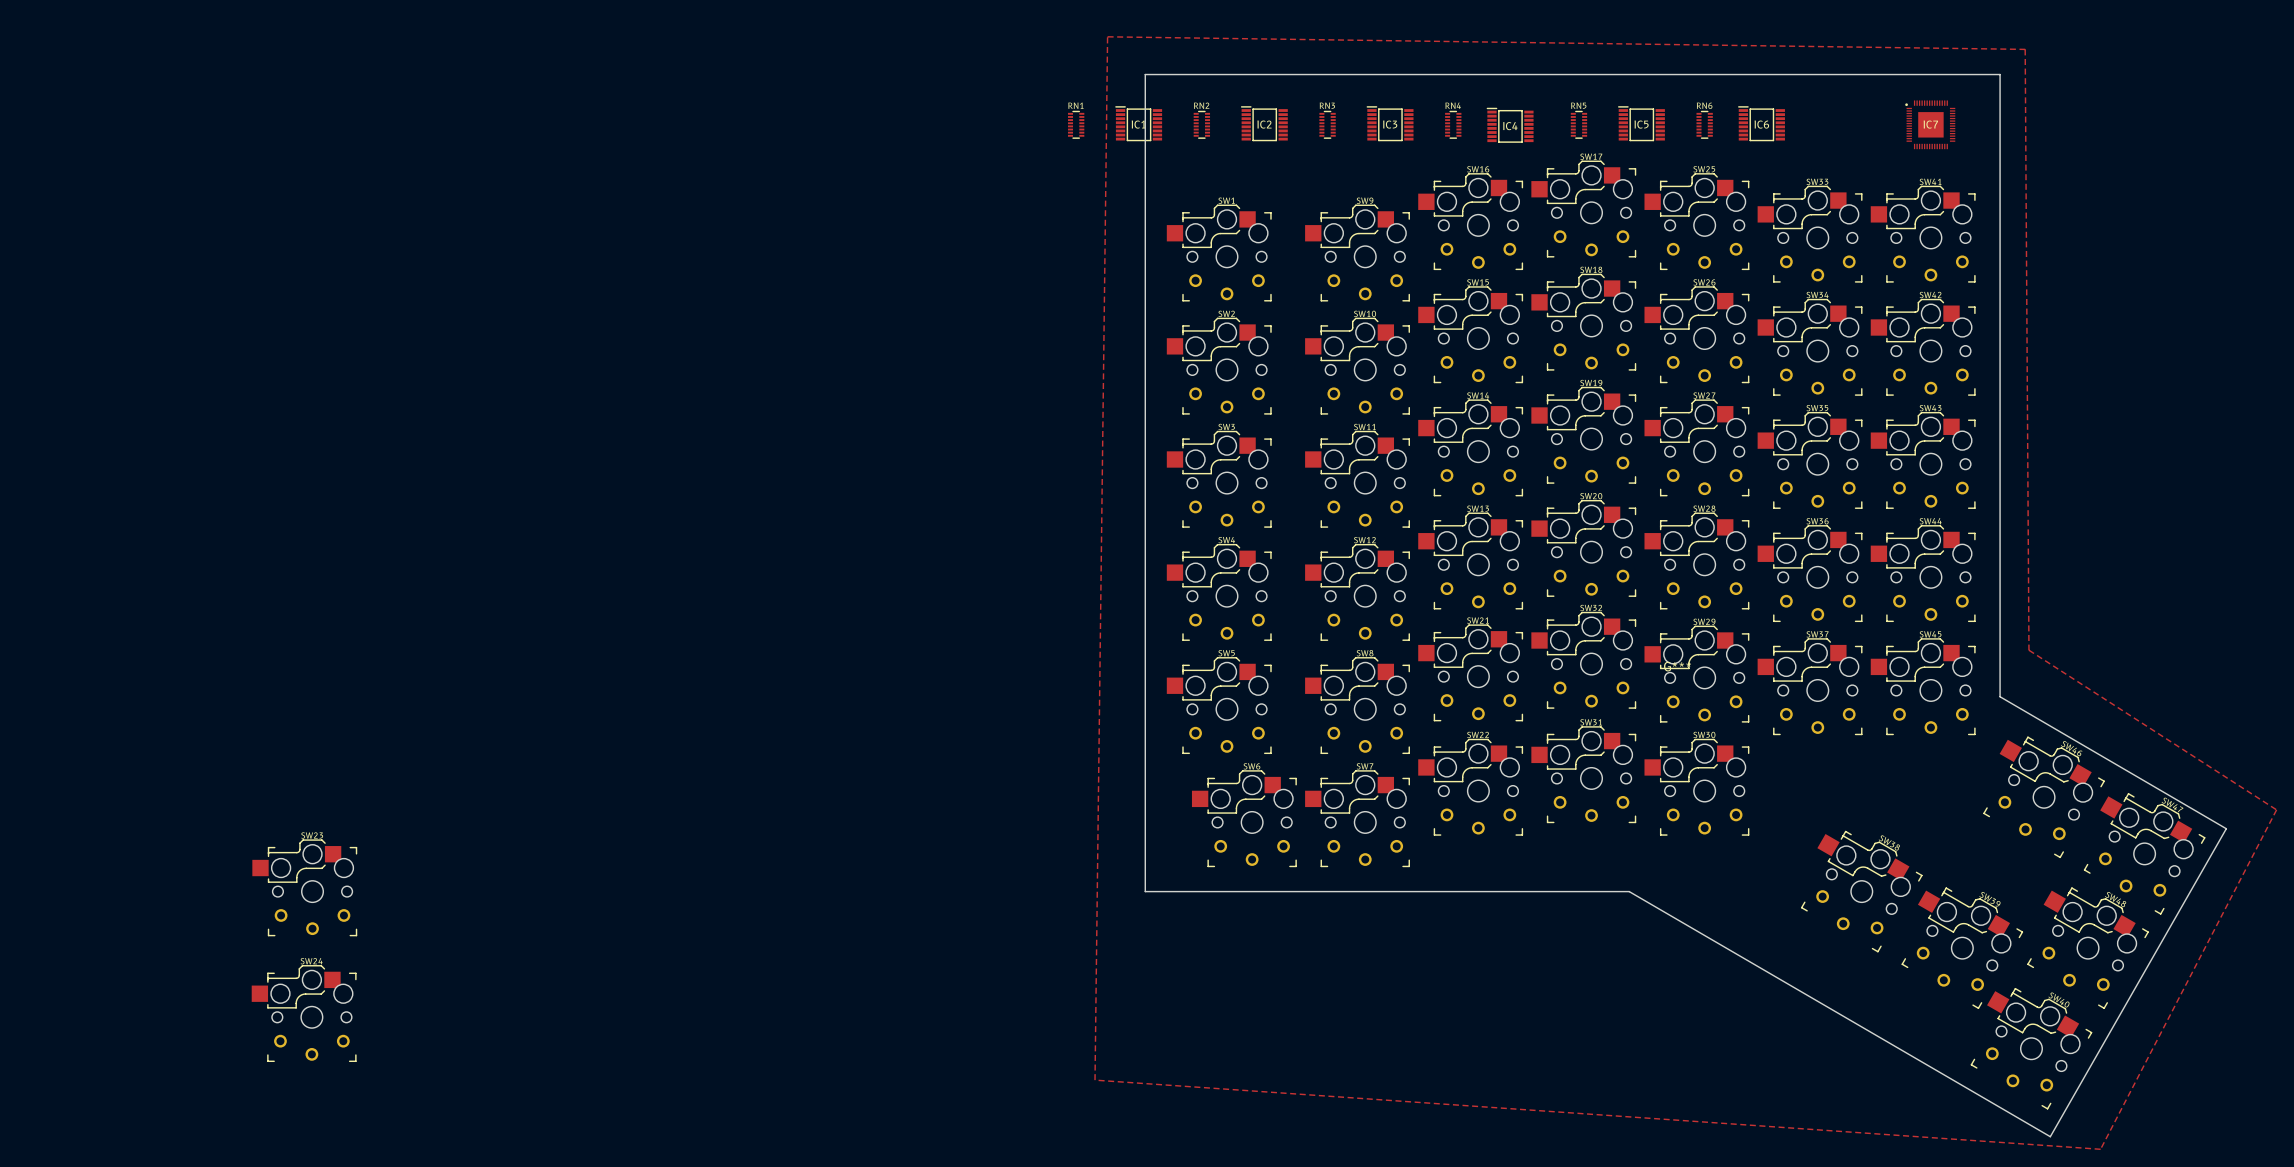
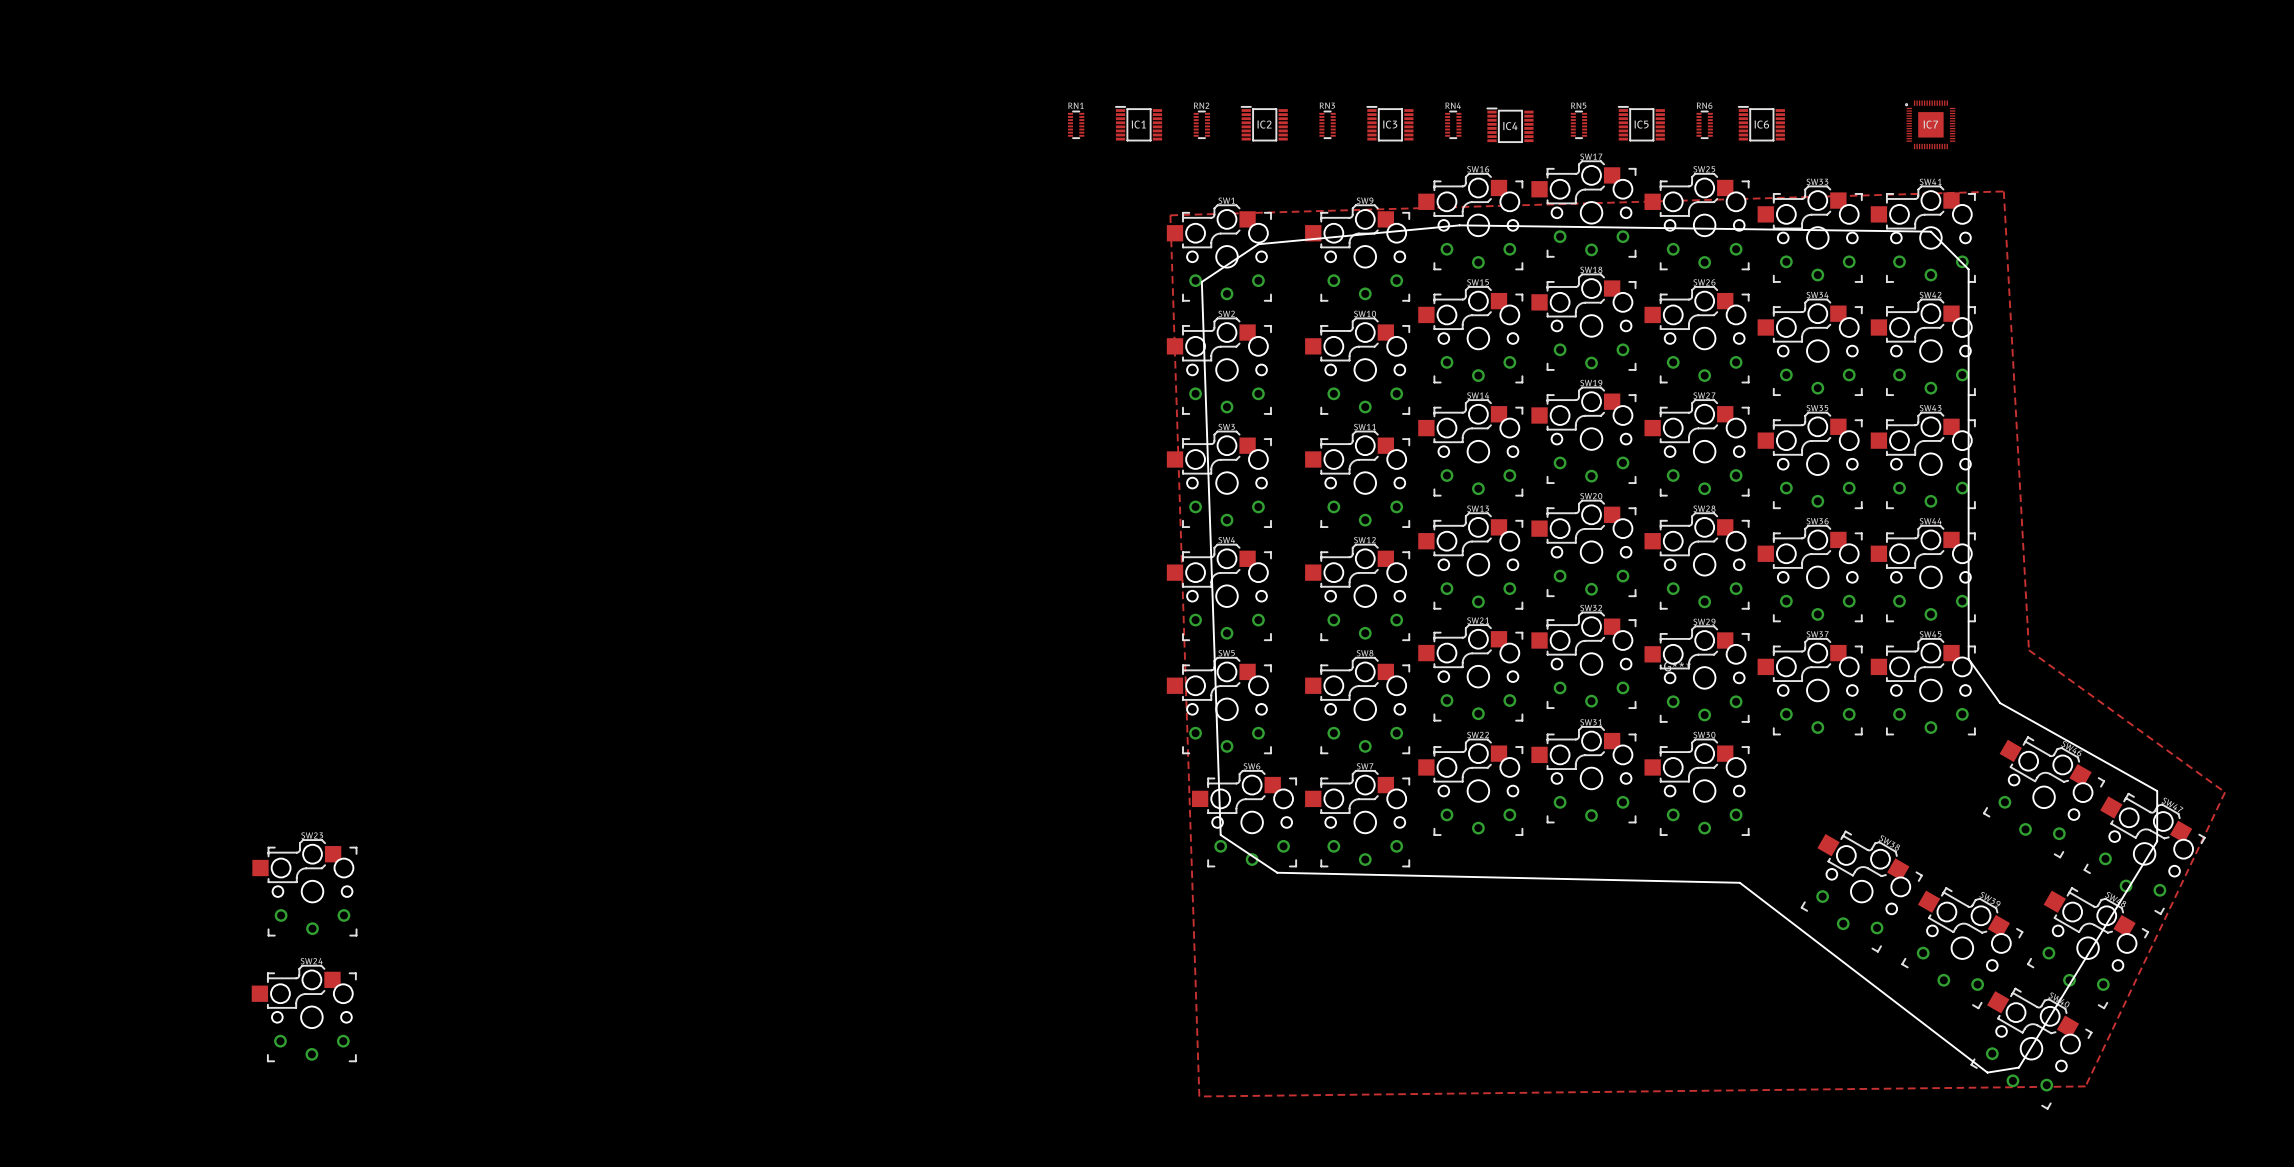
zone outline: (1107, 36) (1095, 1080) (2100, 1149) (2276, 809) (2028, 650) (2025, 49) (1107, 36) -> (2003, 191) (1170, 215) (1199, 1096) (2085, 1086) (2225, 792) (2028, 650) (2003, 191)
board edge: (1145, 74) (1145, 891) (1629, 891) (2050, 1136) (2226, 828) (2000, 696) (2000, 74) (1145, 74) -> (1459, 225) (1258, 244) (1201, 281) (1220, 835) (1277, 872) (1739, 882) (1987, 1072) (2018, 1067) (2157, 841) (2157, 791) (2000, 703) (1968, 659) (1968, 269) (1930, 231) (1459, 225)

